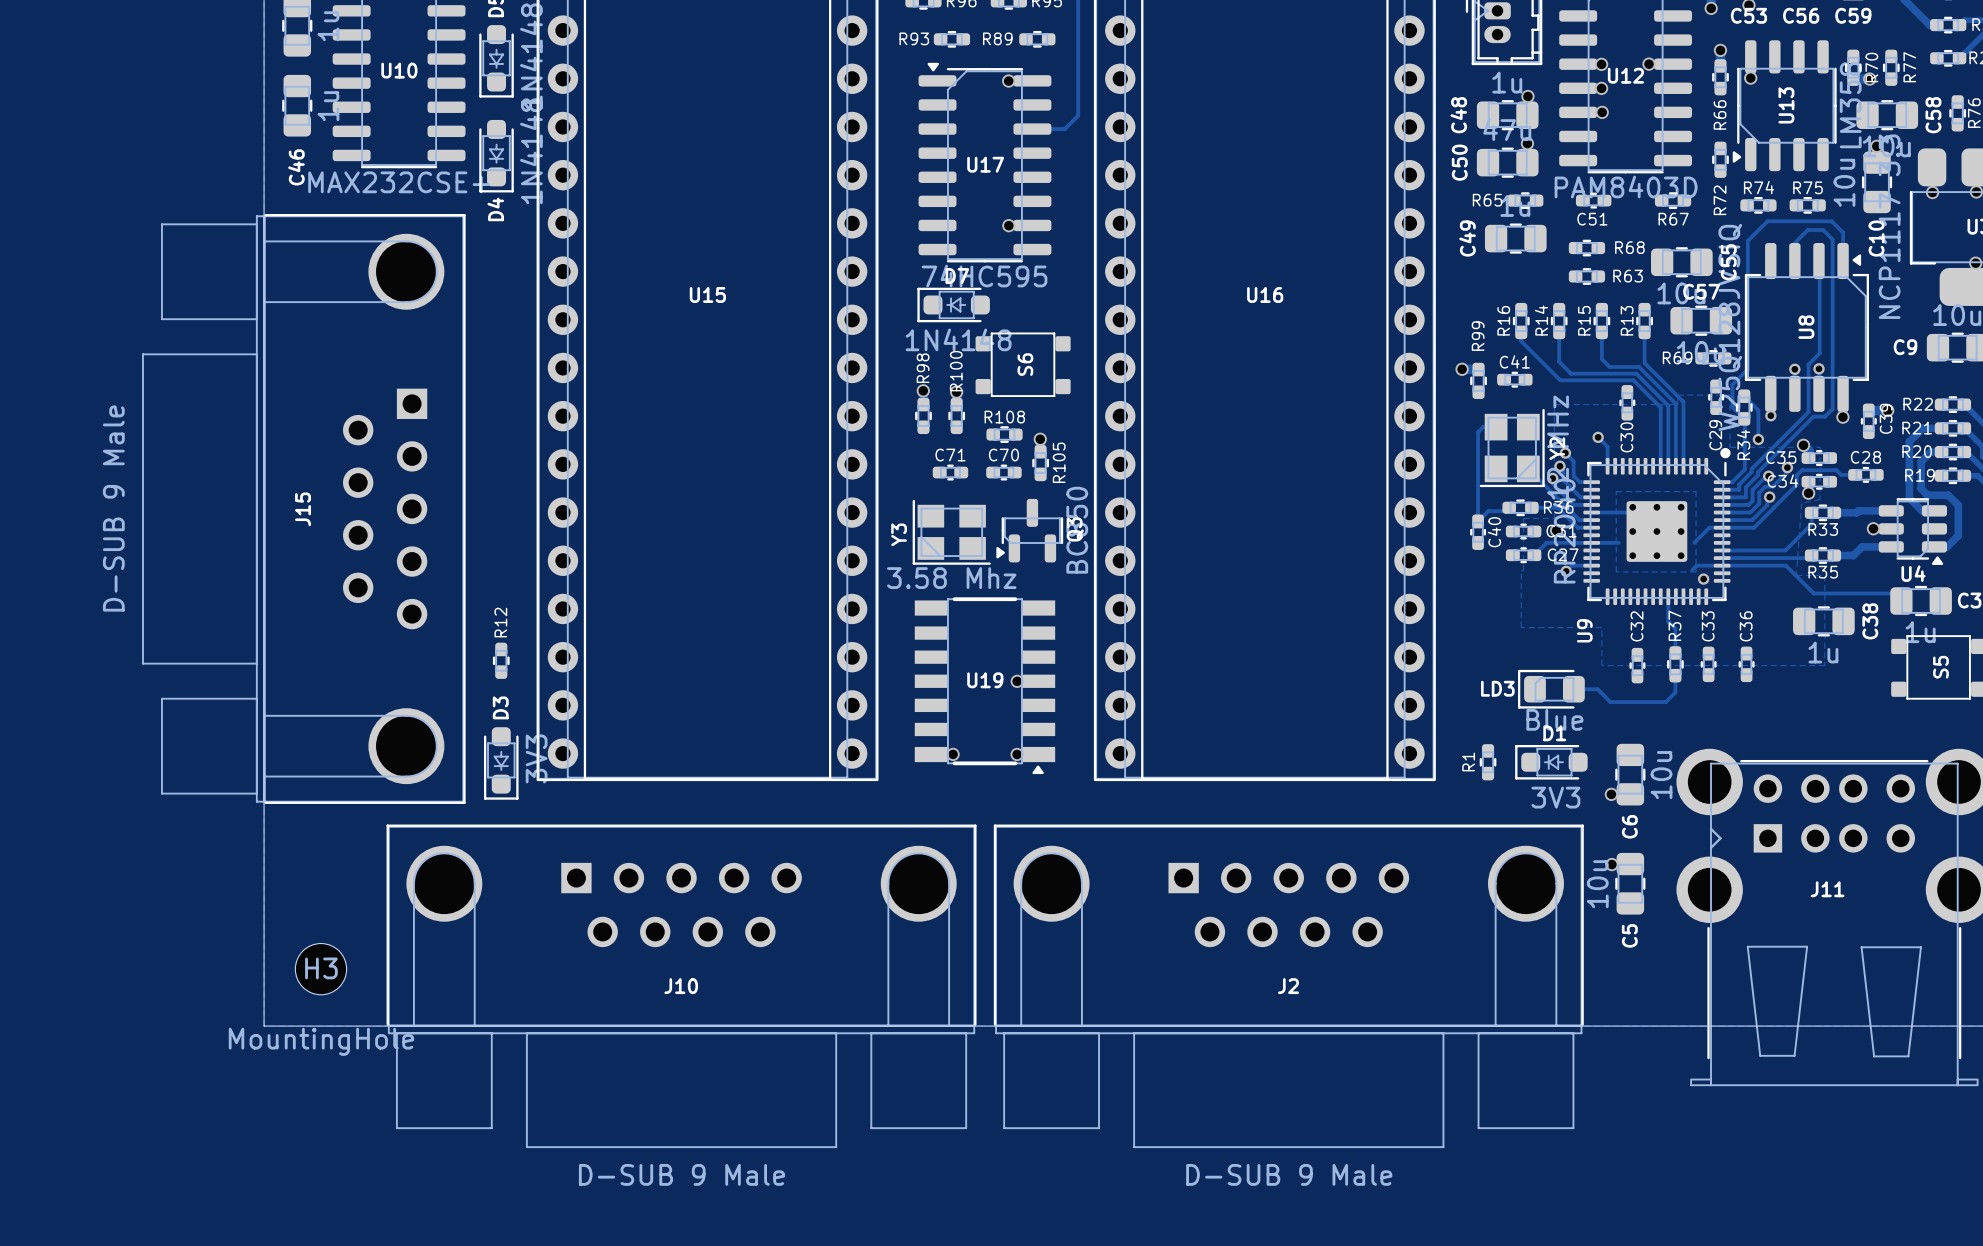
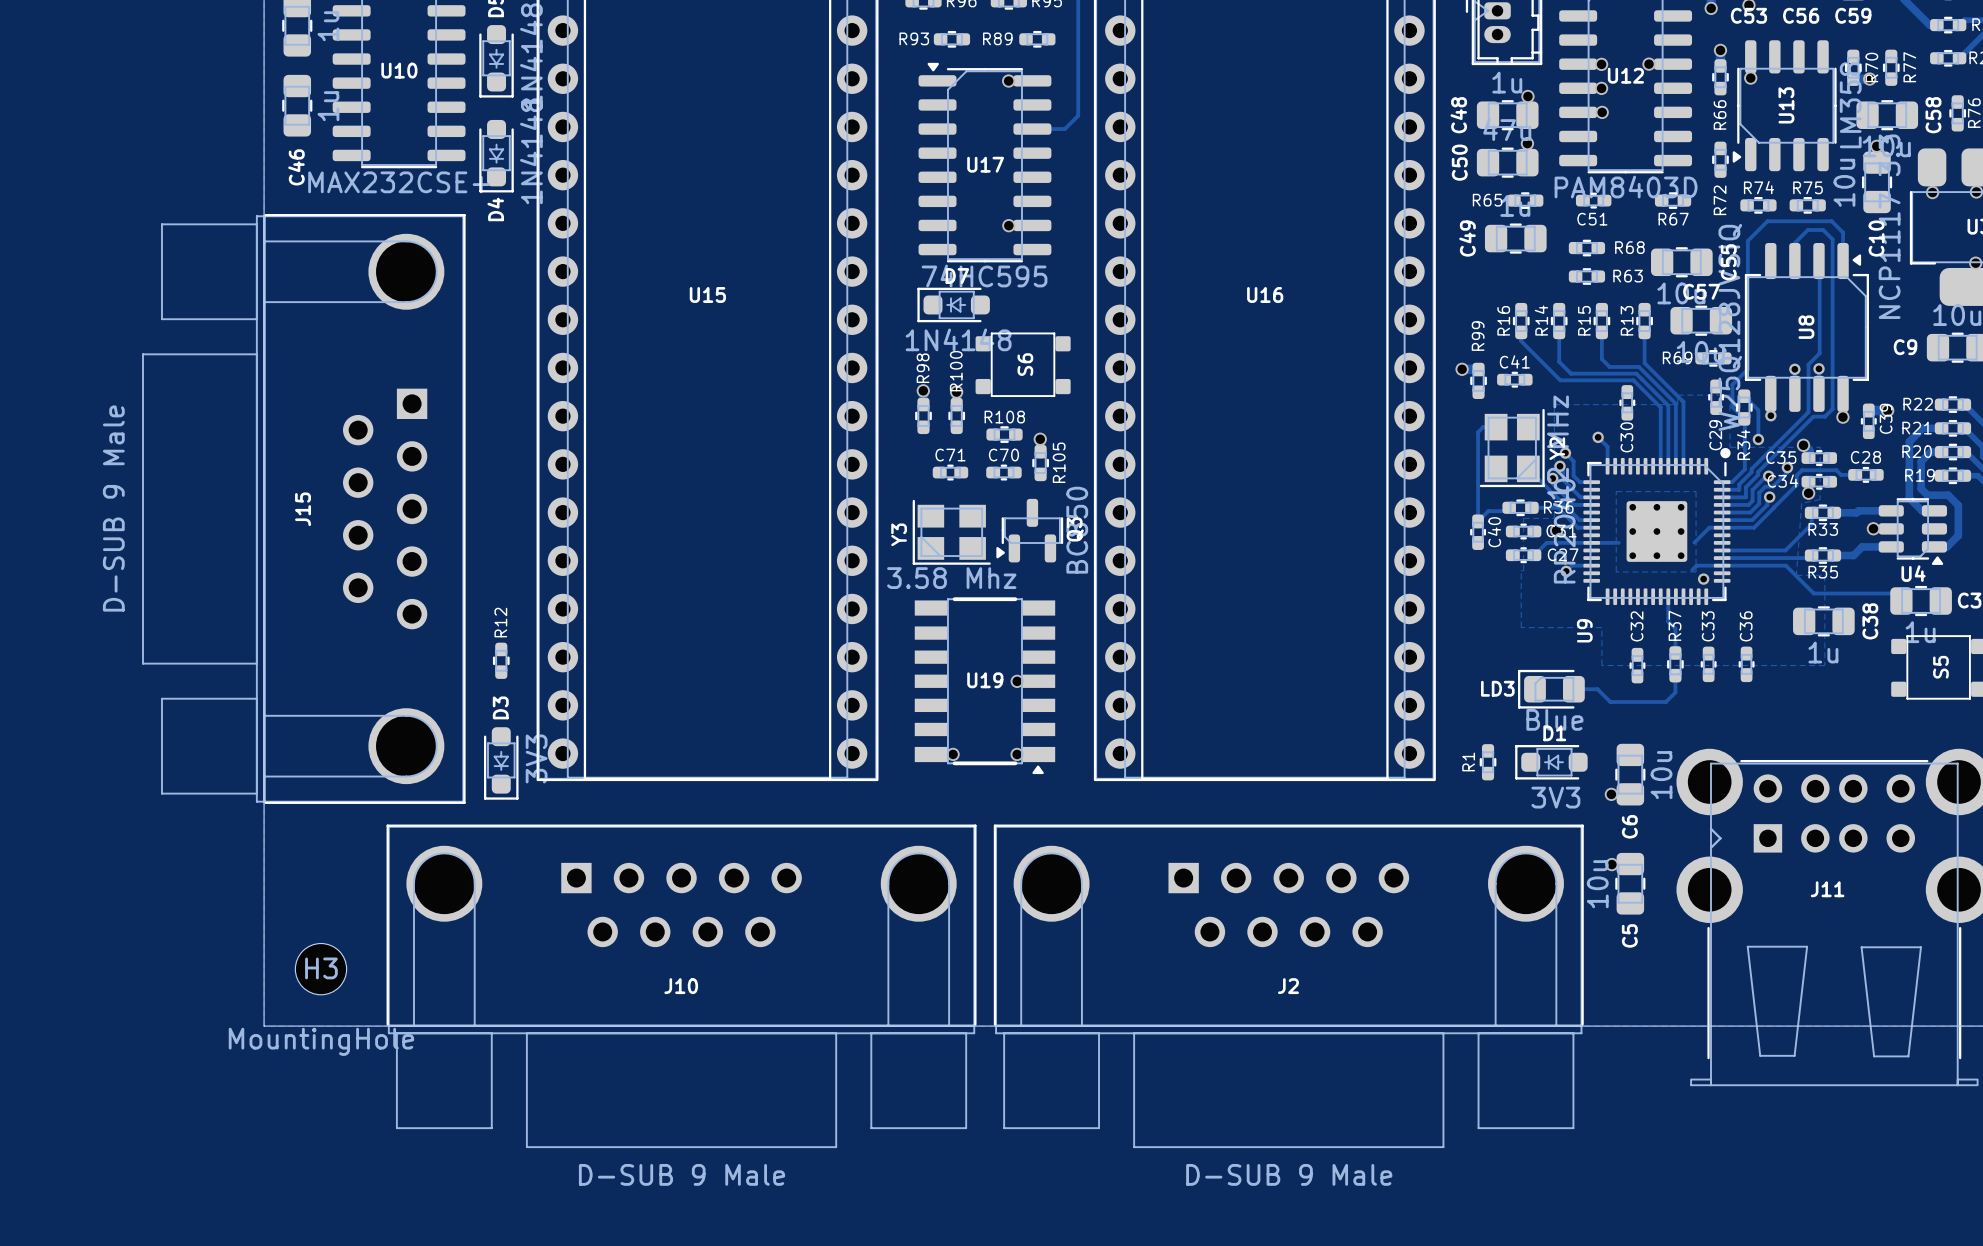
track: (1632, 507) (1627, 512) (1591, 512) -> none

